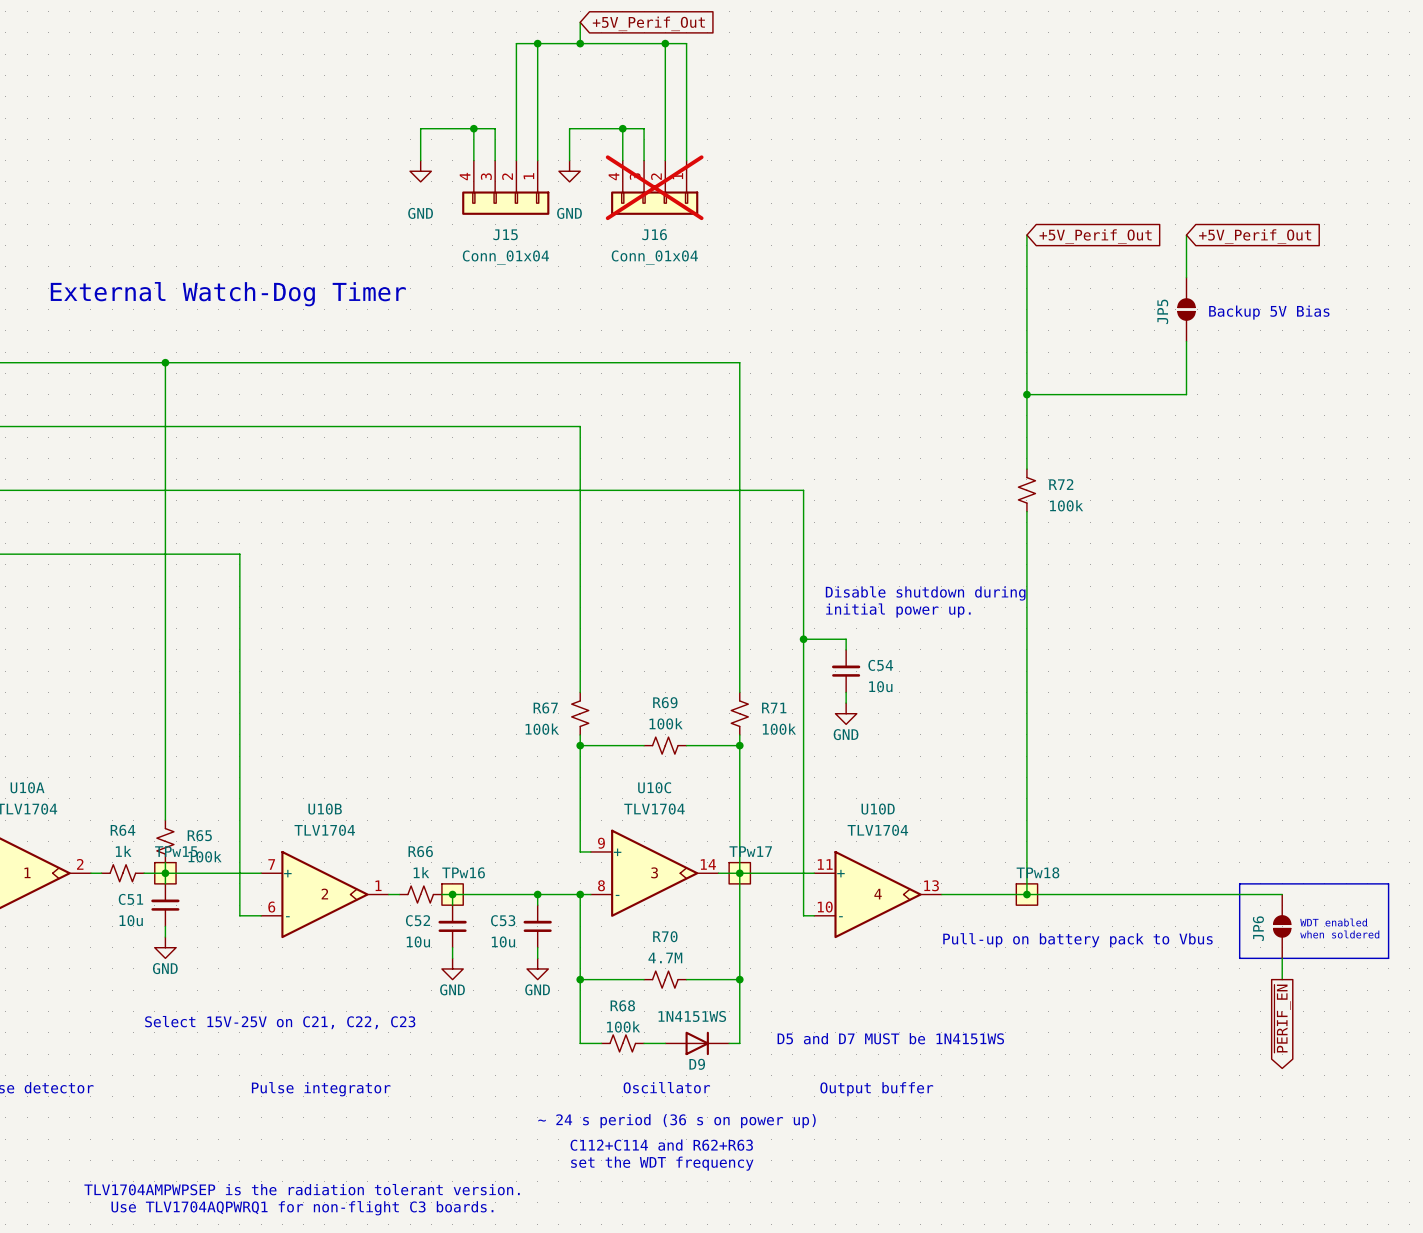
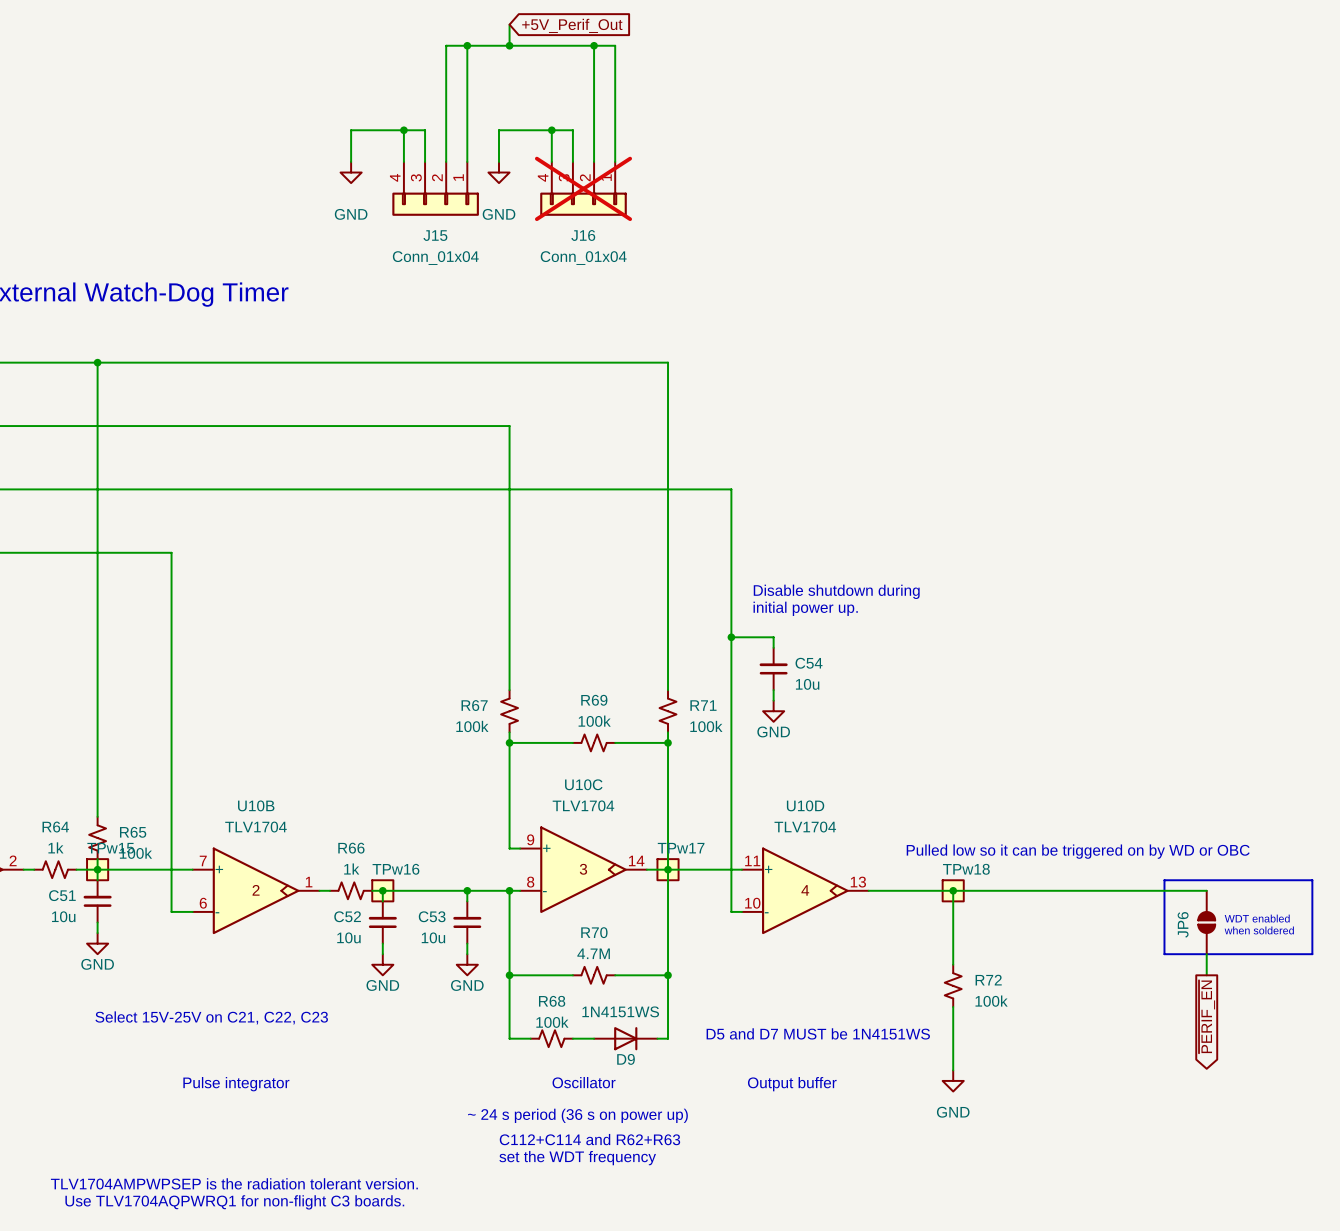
wire: (1026, 235) (1026, 469) -> none
wire: (1186, 235) (1186, 277) -> none
global label: +5V_Perif_Out (1095, 236) -> none
global label: +5V_Perif_Out (1255, 236) -> none
JP5: (1186, 309) -> none
text: Backup 5V Bias (1269, 312) -> none
wire: (1186, 341) (1186, 394) (1026, 394) -> none
junction: (1026, 394) -> none
R72 position: (1026, 490) -> (953, 985)
wire: (1026, 511) (1026, 894) -> (953, 964) (953, 890)
text: none -> Pulled low so it can be triggered on by WD or OBC (1078, 851)
text: Pull-up on battery pack to Vbus (1077, 940) -> none
wire: none -> (953, 1007) (953, 1070)
power symbol: none -> GND (953, 1080)

